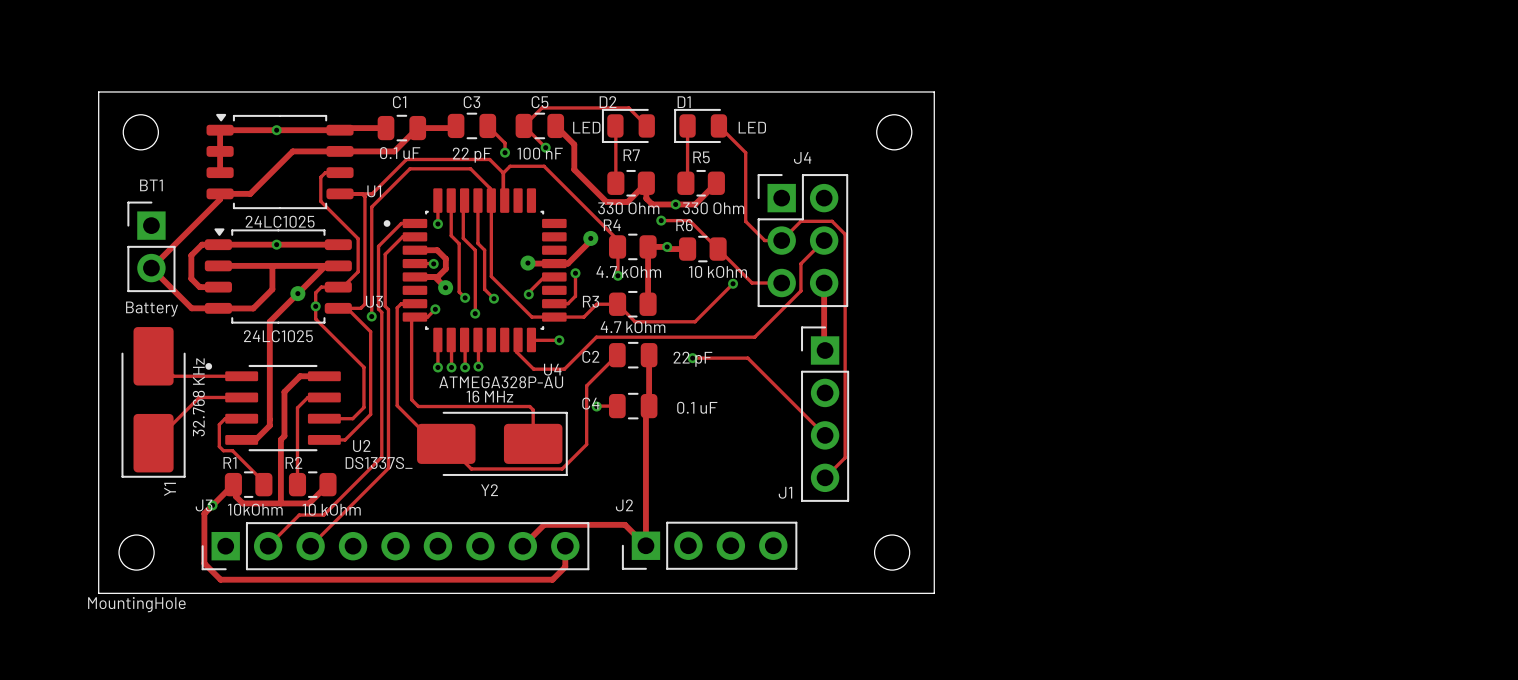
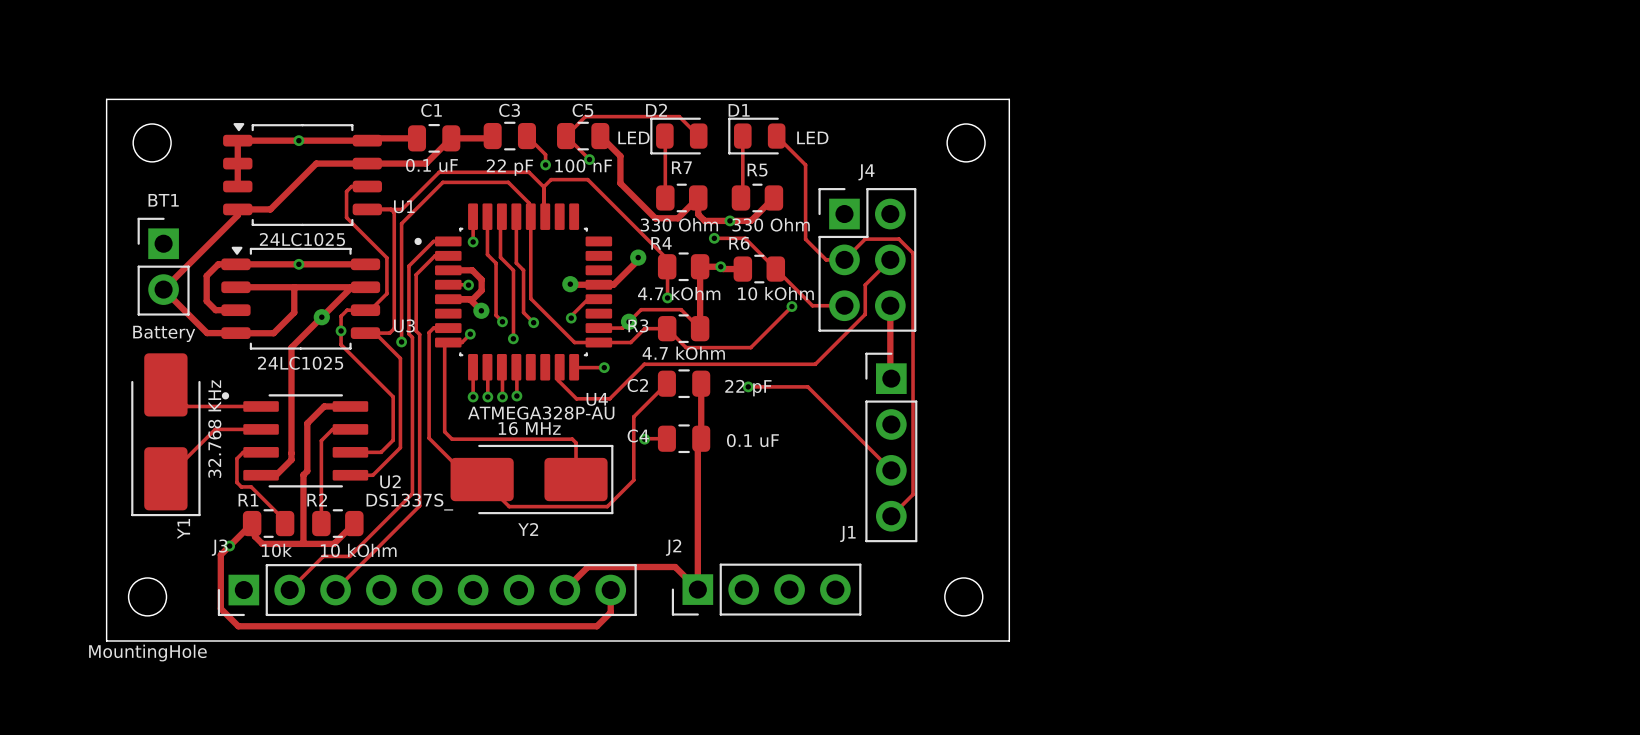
track: (575, 273) (575, 296) (567, 303) -> (700, 328) (681, 309) (641, 309) (622, 328) (613, 328)
via: (575, 273) -> none
via: none -> (629, 321)
R1 value: 10kOhm (255, 509) -> 10k (276, 550)

